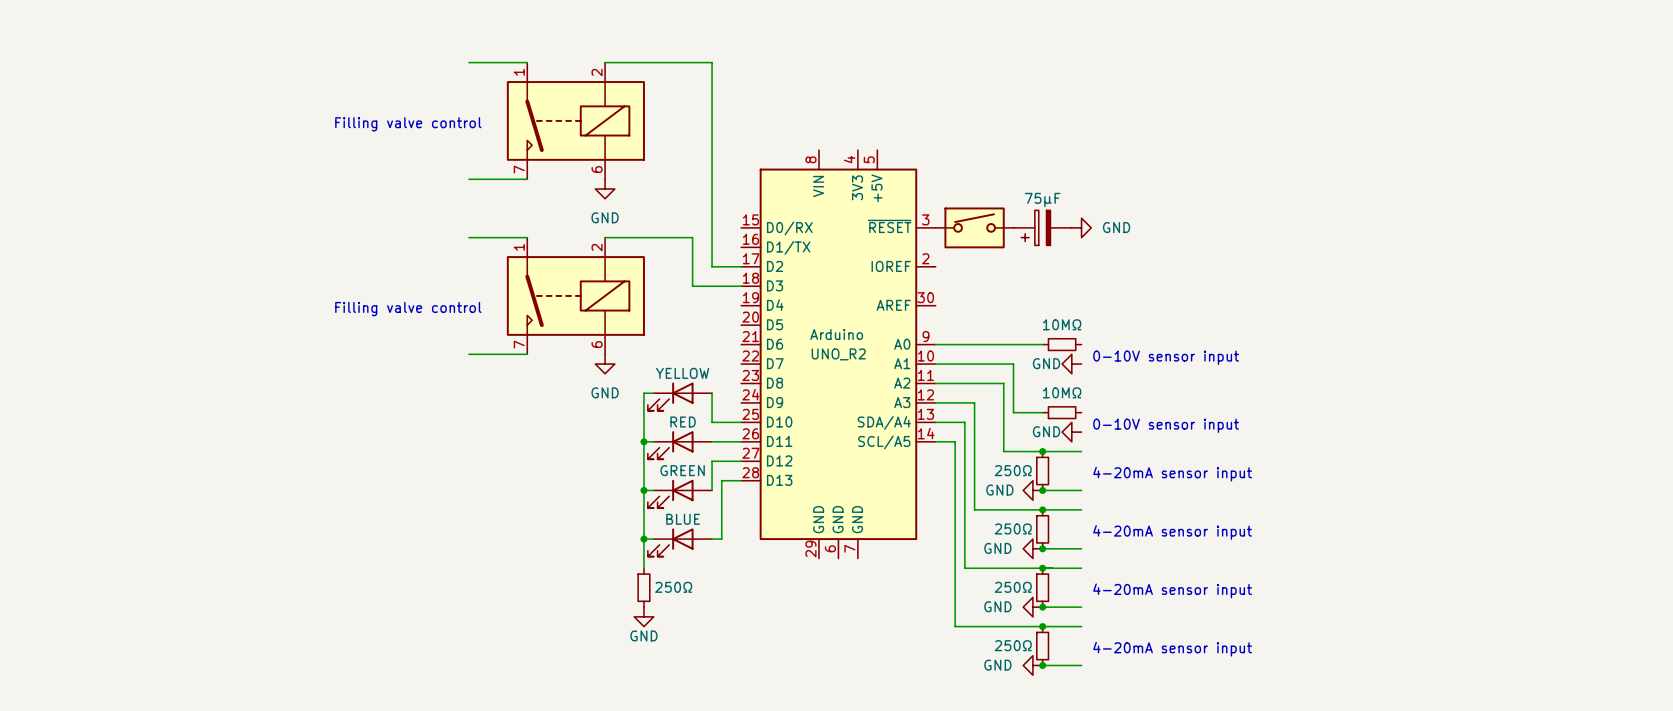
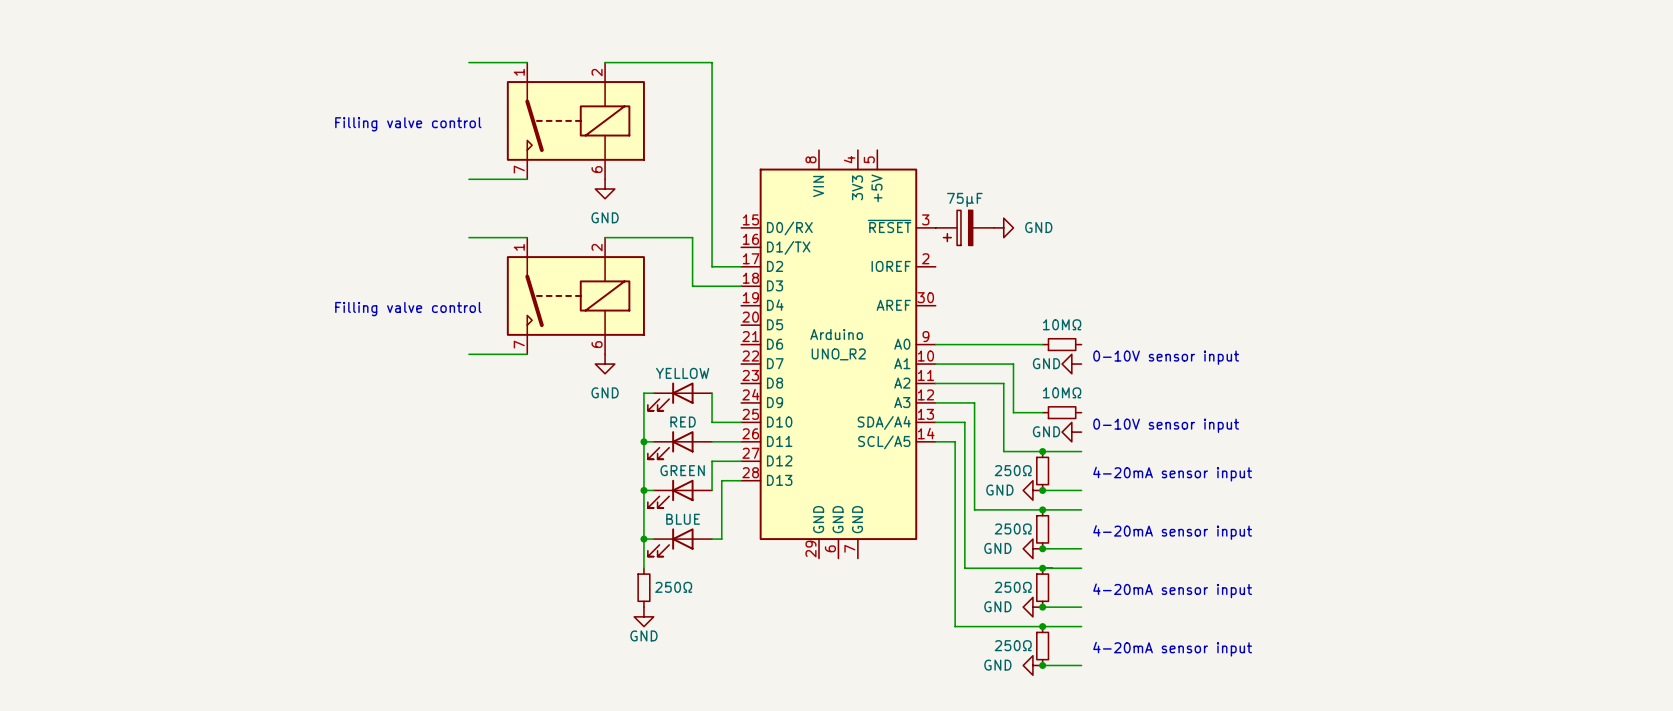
part: (974, 227) -> none
part position: (1042, 227) -> (964, 227)
power symbol position: GND (1081, 227) -> GND (1003, 227)

